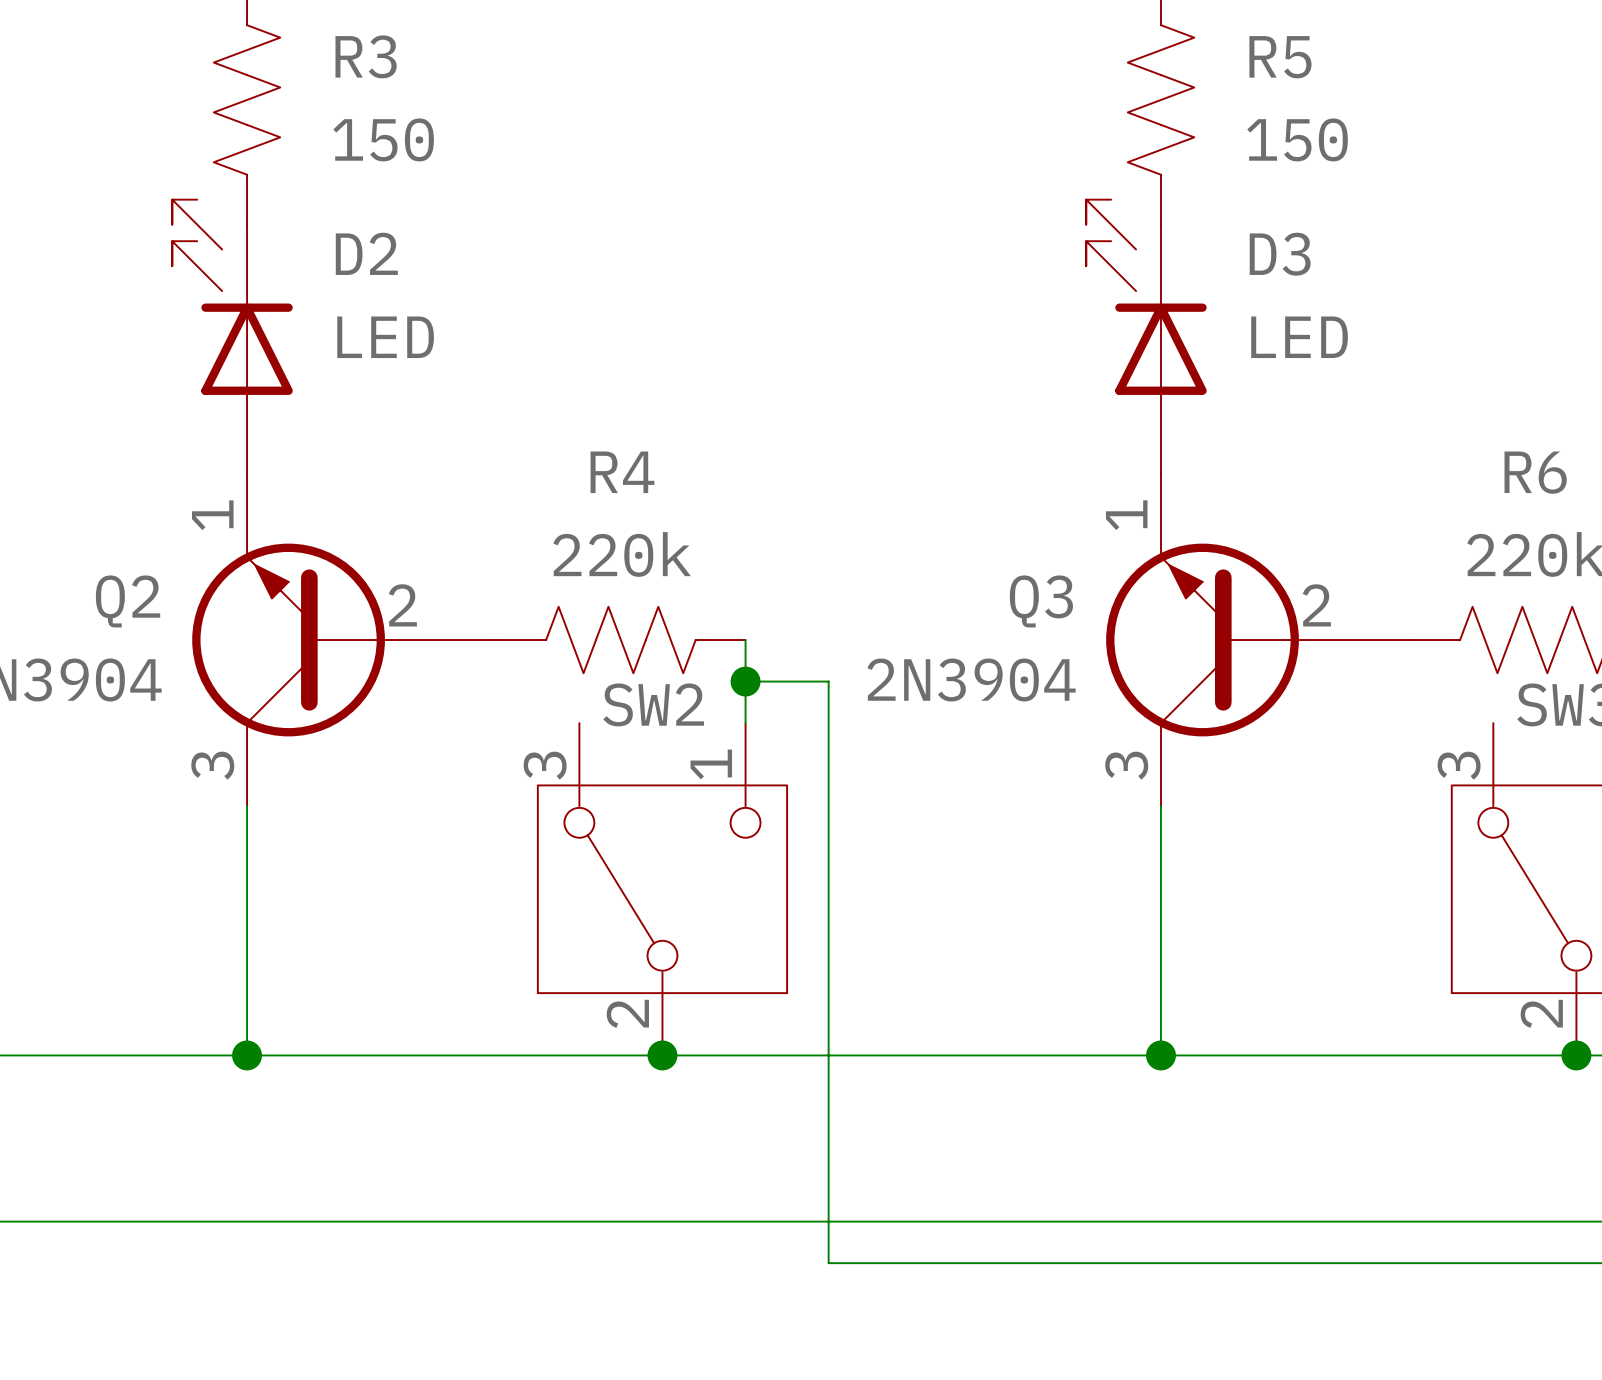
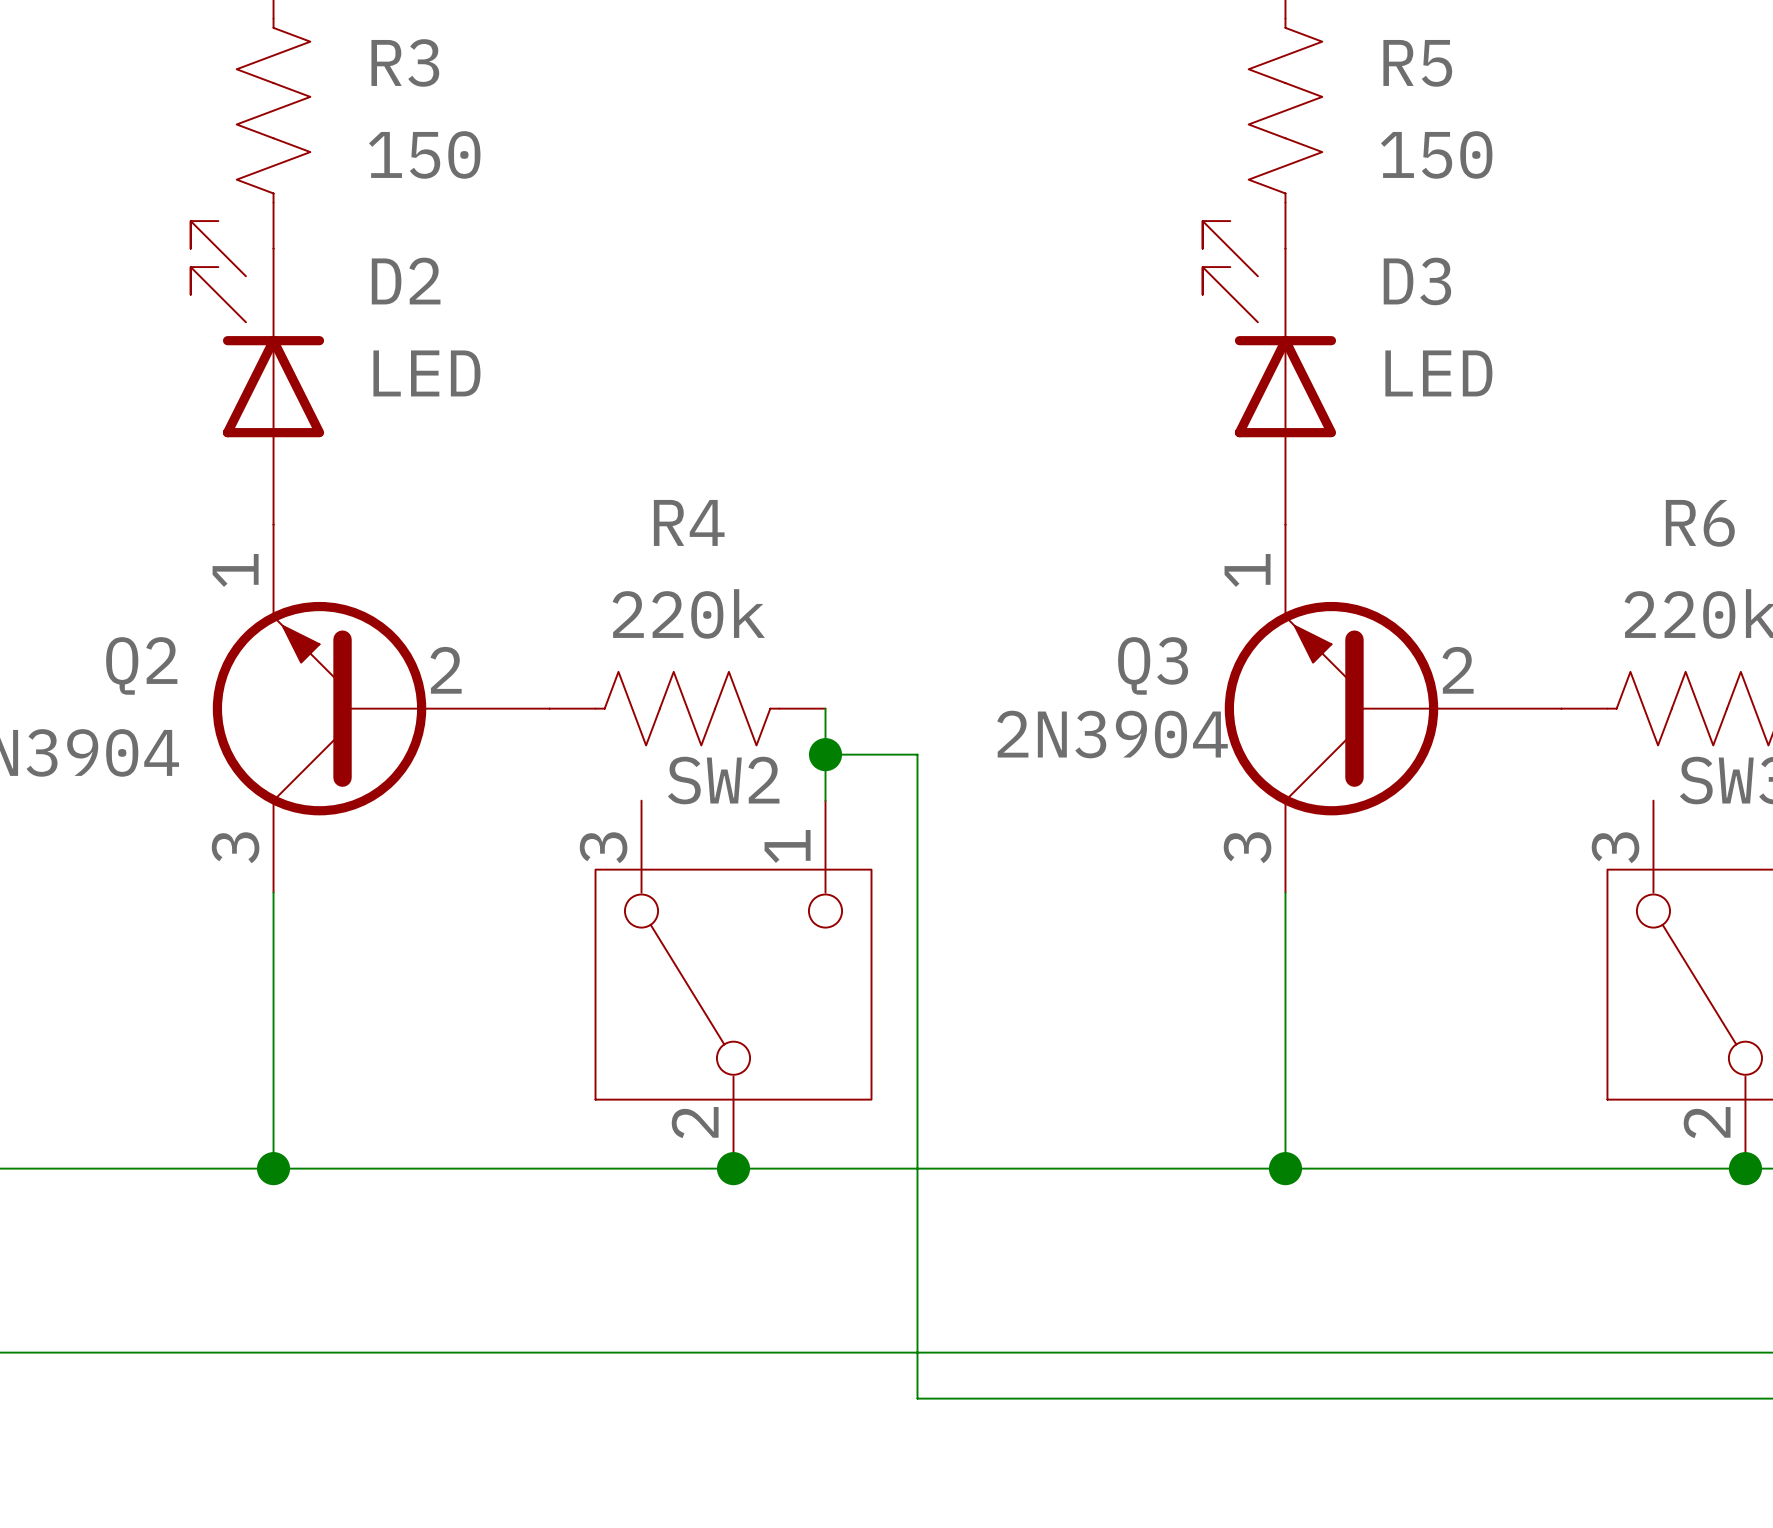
Q3 value position: 2N3904 (971, 680) -> 2N3904 (1112, 734)

